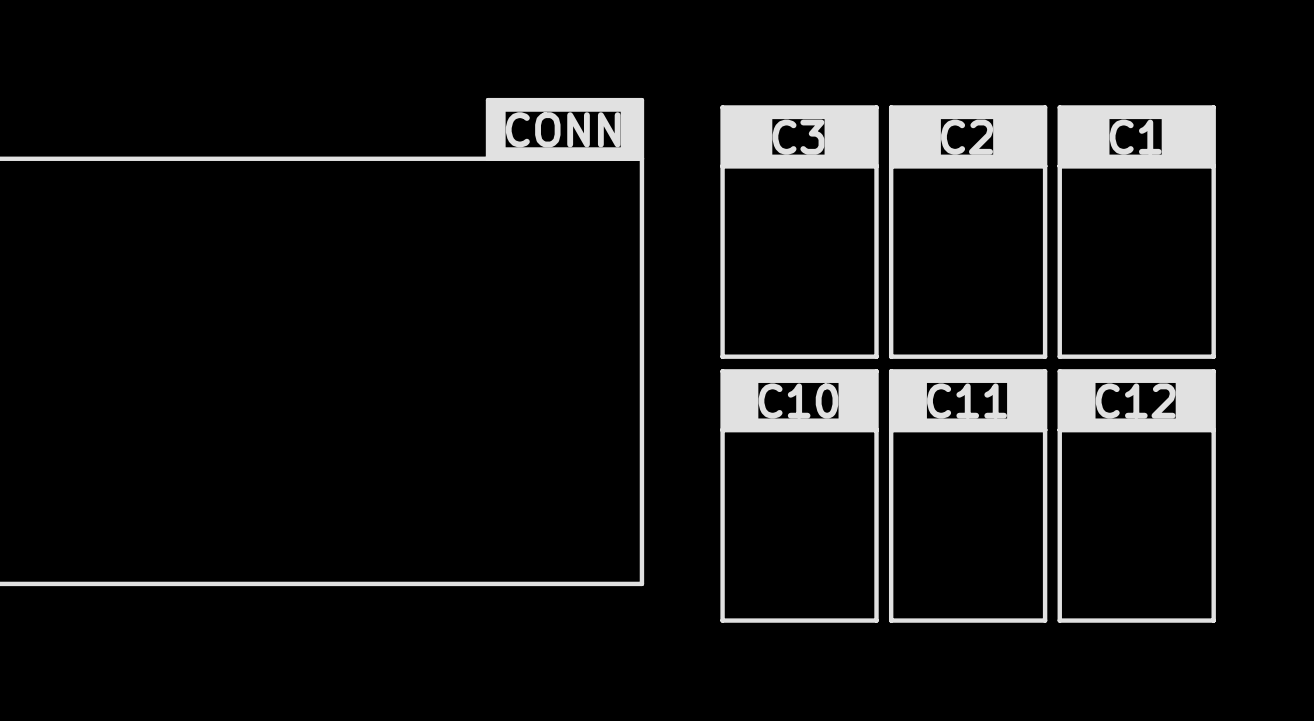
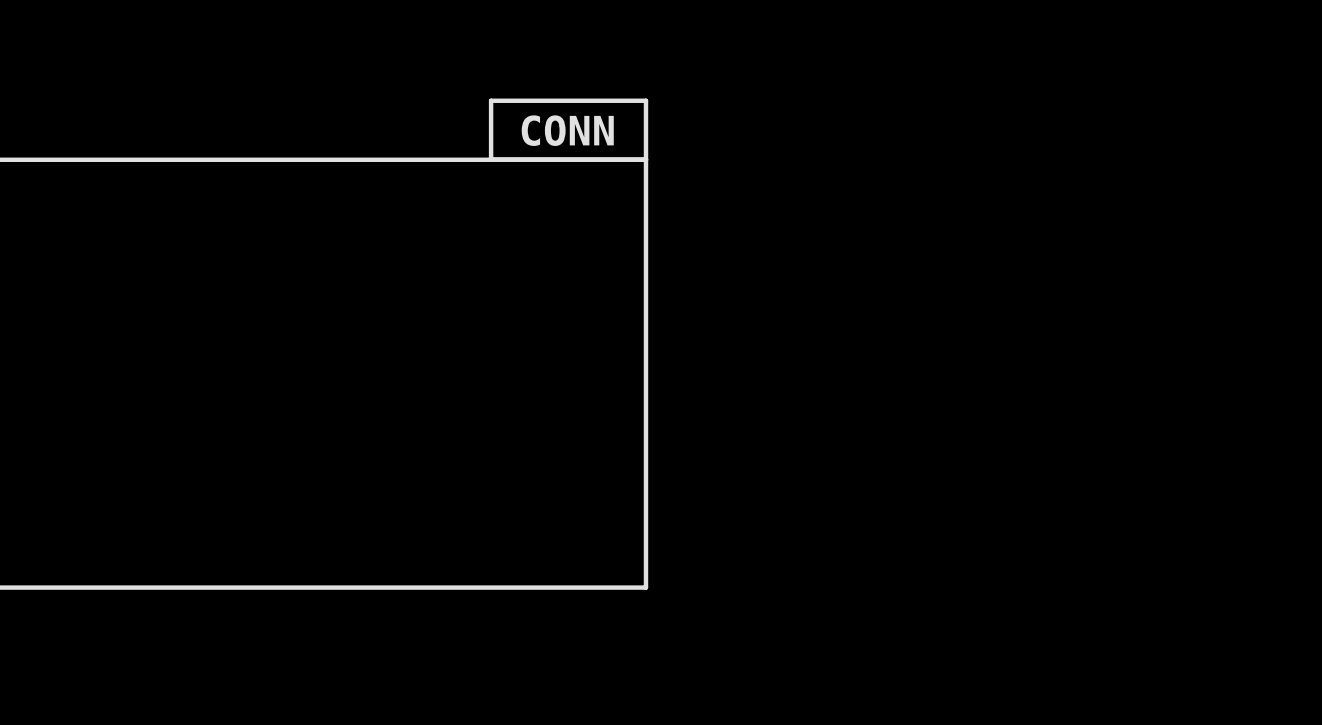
drawing: [487, 100, 642, 159] -> none
line: (722, 107) (722, 356) (876, 356) (876, 107) (722, 107) -> none
drawing: [722, 107, 1214, 167] -> none
line: (891, 107) (891, 356) (1045, 356) (1045, 107) (891, 107) -> none
line: (1059, 107) (1213, 107) (1213, 356) (1059, 356) (1059, 107) -> none
text: C3 (798, 137) -> none
text: C2 (967, 137) -> none
text: C1 (1135, 137) -> none
line: (722, 371) (722, 620) (876, 620) (876, 371) (722, 371) -> none
drawing: [722, 371, 1214, 431] -> none
line: (891, 371) (891, 620) (1045, 620) (1045, 371) (891, 371) -> none
line: (1059, 371) (1213, 371) (1213, 620) (1059, 620) (1059, 371) -> none
text: C10 (798, 401) -> none
text: C11 (967, 401) -> none
text: C12 (1135, 401) -> none

